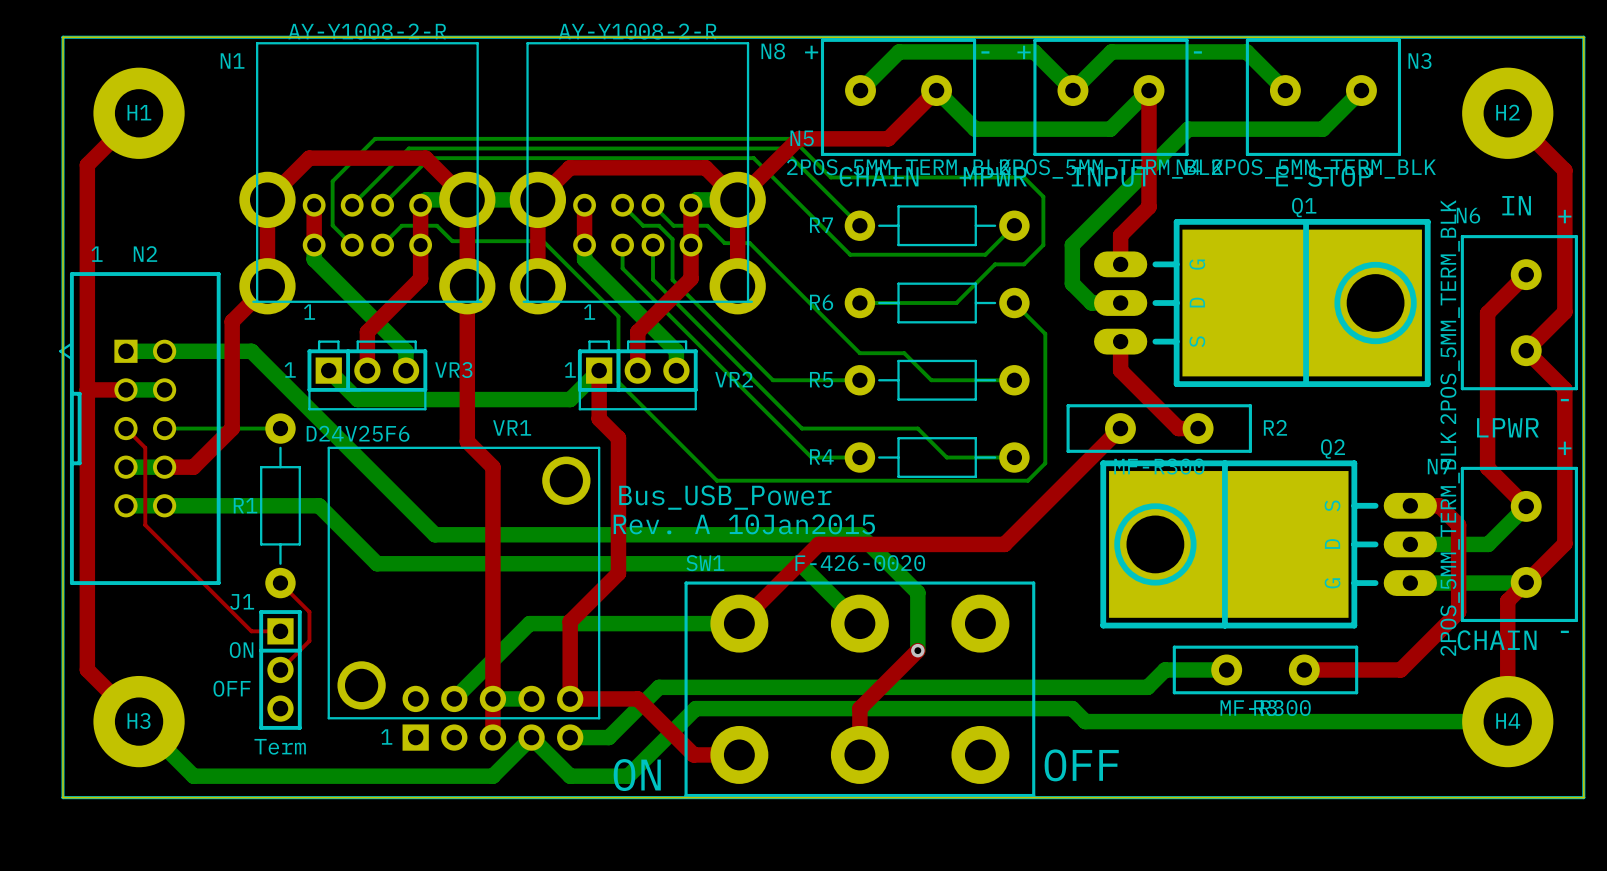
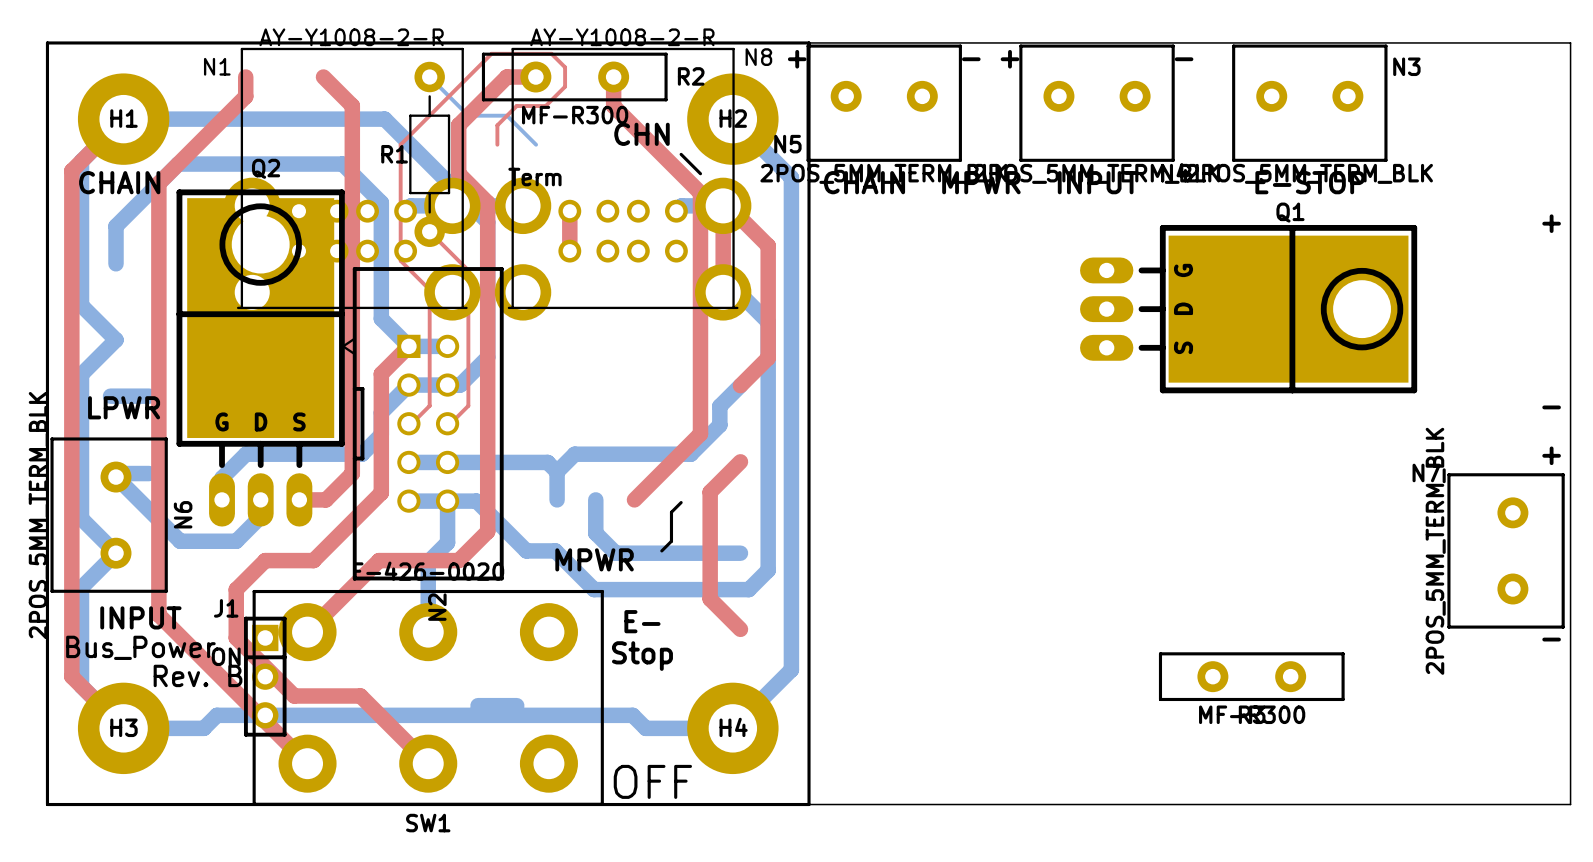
line: (823, 37) (1583, 37) (1583, 797) (823, 797) -> (809, 42) (809, 804)
top track: none -> (245, 77) (245, 96) (158, 183) (158, 615) (307, 763)
top track: none -> (323, 77) (352, 105) (352, 473) (325, 499) (299, 499)
bottom track: none -> (429, 77) (468, 115) (507, 115) (536, 144)
top track: none -> (535, 77) (506, 77) (458, 125) (458, 173) (487, 202) (487, 531) (458, 560) (379, 560) (307, 632)
top track: none -> (613, 77) (613, 106) (700, 193) (700, 433) (634, 499)
bottom track: (860, 90) (899, 51) (1034, 51) (1072, 90) (1111, 51) (1246, 51) (1285, 90) -> none
bottom track: (936, 90) (975, 129) (1110, 129) (1149, 90) -> none
top track: (936, 90) (888, 138) (798, 138) (737, 199) (705, 167) (569, 167) (537, 199) (537, 286) -> none
top track: (1149, 90) (1149, 207) (1120, 235) (1120, 264) -> none
bottom track: (1361, 90) (1322, 129) (1188, 129) (1072, 245) (1072, 283) (1091, 303) (1120, 303) -> none
bottom track: none -> (732, 119) (791, 177) (791, 669) (732, 728) (645, 728) (632, 715) (216, 715) (203, 728) (123, 728) (81, 686) (81, 587) (116, 553) (81, 518) (81, 374) (116, 339) (81, 305) (81, 161) (123, 119) (384, 119) (487, 222) (487, 357) (460, 385) (408, 385) (381, 412) (381, 434) (361, 454) (245, 454) (222, 478) (222, 499)
top track: (1507, 113) (1564, 170) (1564, 312) (1526, 350) (1564, 389) (1564, 543) (1507, 600) (1507, 721) -> none
H2 position: (1507, 113) -> (732, 119)
text: none -> CHN (642, 134)
top track: none -> (497, 144) (497, 125) (516, 106) (545, 106) (565, 86) (565, 67) (551, 53) (491, 53) (400, 144) (400, 260) (429, 289) (429, 405) (411, 423) (408, 423)
line: none -> (681, 154) (700, 173)
text: none -> Term (534, 177)
text: none -> CHAIN (119, 182)
bottom track: (352, 205) (408, 148) (782, 148) (859, 225) -> none
bottom track: (382, 205) (429, 158) (753, 158) (850, 254) (985, 254) (1014, 225) -> none
top track: (420, 205) (420, 278) (367, 331) (367, 370) -> none
bottom track: (622, 205) (643, 225) (659, 225) (672, 239) (672, 279) (772, 380) (859, 380) -> none
bottom track: (652, 205) (673, 225) (707, 225) (724, 243) (749, 243) (859, 353) (904, 353) (931, 380) (1014, 380) -> none
top track: (691, 205) (691, 278) (637, 331) (637, 370) -> none
text: IN (1516, 205) -> none
top track: none -> (740, 218) (768, 245) (768, 357) (740, 385)
N6 name rotation: 0° (1468, 215) -> 90° counterclockwise (183, 514)
N6 name position: N6 (1468, 215) -> N6 (183, 514)
top track: none -> (429, 231) (468, 270) (468, 405) (450, 423) (447, 423)
R7: (937, 225) -> none
bottom track: (314, 245) (314, 259) (406, 351) (406, 370) -> none
bottom track: (352, 245) (332, 225) (332, 181) (375, 138) (792, 138) (830, 177) (1024, 177) (1043, 196) (1043, 245) (1024, 264) (995, 264) (956, 303) (859, 303) -> none
bottom track: (382, 245) (401, 225) (436, 225) (452, 241) (543, 241) (618, 316) (618, 382) (716, 480) (1027, 480) (1045, 463) (1045, 333) (1014, 303) -> none
bottom track: (584, 245) (584, 259) (676, 351) (676, 370) -> none
bottom track: (622, 245) (622, 268) (811, 457) (859, 457) -> none
bottom track: (652, 245) (652, 279) (801, 428) (917, 428) (946, 457) (1014, 457) -> none
text: 1 (97, 254) -> none
N2 name rotation: 0° (145, 254) -> 90° counterclockwise (437, 607)
N2 name position: N2 (145, 254) -> N2 (437, 607)
bottom track: none -> (116, 263) (116, 226) (178, 164) (342, 164) (381, 202) (381, 318) (408, 346) (447, 346)
top track: (1526, 274) (1487, 313) (1487, 467) (1526, 506) -> none
bottom track: none -> (740, 294) (768, 322) (768, 570) (748, 589) (594, 589) (555, 550) (526, 550) (476, 501) (408, 501)
R6: (937, 303) -> none
text: 1 (309, 312) -> none
text: 1 (589, 312) -> none
N6 position: (1519, 312) -> (109, 515)
top track: none -> (408, 346) (381, 373) (381, 492) (313, 560) (265, 560) (236, 589) (236, 637) (294, 696) (360, 696) (428, 763)
top track: (1120, 341) (1120, 370) (1178, 428) (1198, 428) -> none
bottom track: (125, 351) (251, 351) (434, 534) (859, 534) (917, 592) (917, 650) -> none
text: 1 (290, 370) -> none
bottom track: (328, 370) (357, 399) (570, 399) (599, 370) -> none
text: 1 (570, 370) -> none
top track: (599, 370) (599, 418) (618, 438) (618, 573) (570, 621) (570, 698) (637, 698) (693, 754) (739, 754) -> none
VR3: (367, 375) -> none
VR2: (637, 375) -> none
bottom track: none -> (740, 385) (719, 406) (719, 425) (690, 454) (574, 454) (557, 471)
R5: (937, 380) -> none
top track: (87, 389) (125, 389) -> none
text: none -> LPWR (124, 407)
text: LPWR (1507, 427) -> none
top track: (125, 428) (145, 447) (145, 525) (251, 631) (280, 631) -> none
N2 position: (139, 428) -> (422, 423)
bottom track: (164, 428) (280, 428) -> none
top track: (1120, 428) (1004, 544) (818, 544) (739, 623) -> none
R2 position: (1159, 428) -> (574, 77)
Q2 name position: Q2 (1333, 448) -> Q2 (266, 168)
top track: none -> (740, 461) (710, 492) (710, 599) (740, 629)
bottom track: none -> (408, 462) (547, 462) (557, 471)
R4: (937, 457) -> none
bottom track: none -> (557, 471) (557, 499)
top track: (164, 467) (193, 467) (232, 428) (232, 321) (267, 286) (267, 199) (309, 158) (425, 158) (467, 199) (467, 441) (492, 467) (492, 737) -> none
bottom track: none -> (116, 477) (180, 541) (236, 541) (260, 516) (260, 499)
bottom track: none -> (595, 499) (595, 533) (615, 553) (740, 553)
bottom track: none -> (447, 501) (447, 542) (428, 562) (428, 632)
line: none -> (681, 502) (671, 512) (671, 541) (661, 550)
text: Bus_USB_Power (725, 497) -> none
bottom track: (125, 505) (319, 505) (377, 563) (800, 563) (859, 623) -> none
R1 position: (280, 505) -> (429, 154)
top track: (1410, 505) (1439, 505) (1458, 525) (1458, 612) (1400, 669) (1304, 669) -> none
bottom track: (1526, 506) (1488, 544) (1410, 544) -> none
text: Rev. A 10Jan2015 (744, 524) -> none
Q2 rotation: 0° (1268, 544) -> 90° clockwise (260, 358)
Q2 position: (1268, 544) -> (260, 358)
text: none -> MPWR (594, 559)
SW1 name position: SW1 (705, 563) -> SW1 (428, 823)
bottom track: (1526, 582) (1410, 583) -> none
top track: (280, 583) (309, 612) (309, 640) (280, 669) -> none
VR1: D24V25F6 (463, 598) -> none
text: none -> INPUT (140, 617)
text: none -> E- (642, 621)
bottom track: (739, 623) (529, 623) (454, 698) -> none
text: CHAIN (1497, 640) -> none
text: none -> Bus_Power (140, 647)
text: none -> Stop (642, 656)
top track: (917, 650) (859, 708) (859, 754) -> none
via: (917, 650) -> none
text: none -> Rev. B (198, 675)
bottom track: (1226, 669) (1165, 669) (1147, 687) (659, 687) (608, 737) (570, 737) -> none
text: OFF (232, 688) -> none
SW1 position: (859, 689) -> (428, 697)
bottom track: (139, 721) (193, 776) (492, 776) (531, 737) (570, 776) (628, 776) (695, 708) (1072, 708) (1085, 721) (1507, 721) -> none
H4 position: (1507, 721) -> (732, 728)
text: 1 (386, 736) -> none
text: Term (280, 746) -> none
text: OFF (1081, 765) -> none
text: ON (637, 775) -> none
text: none -> OFF (652, 781)

